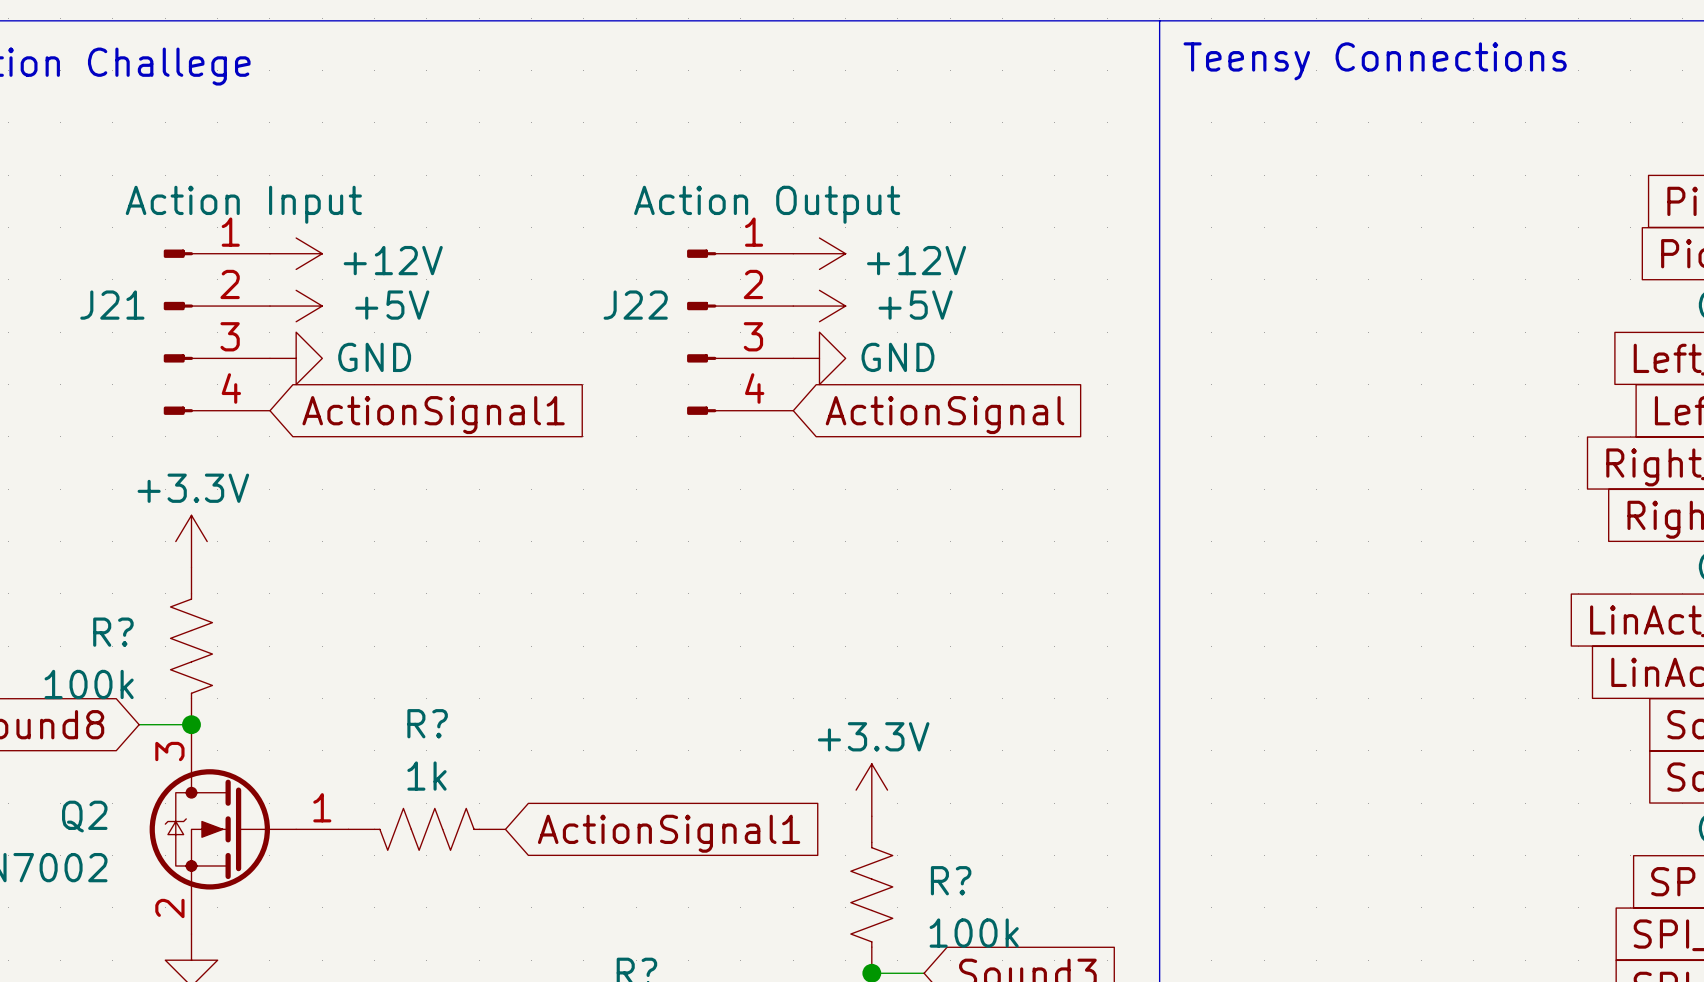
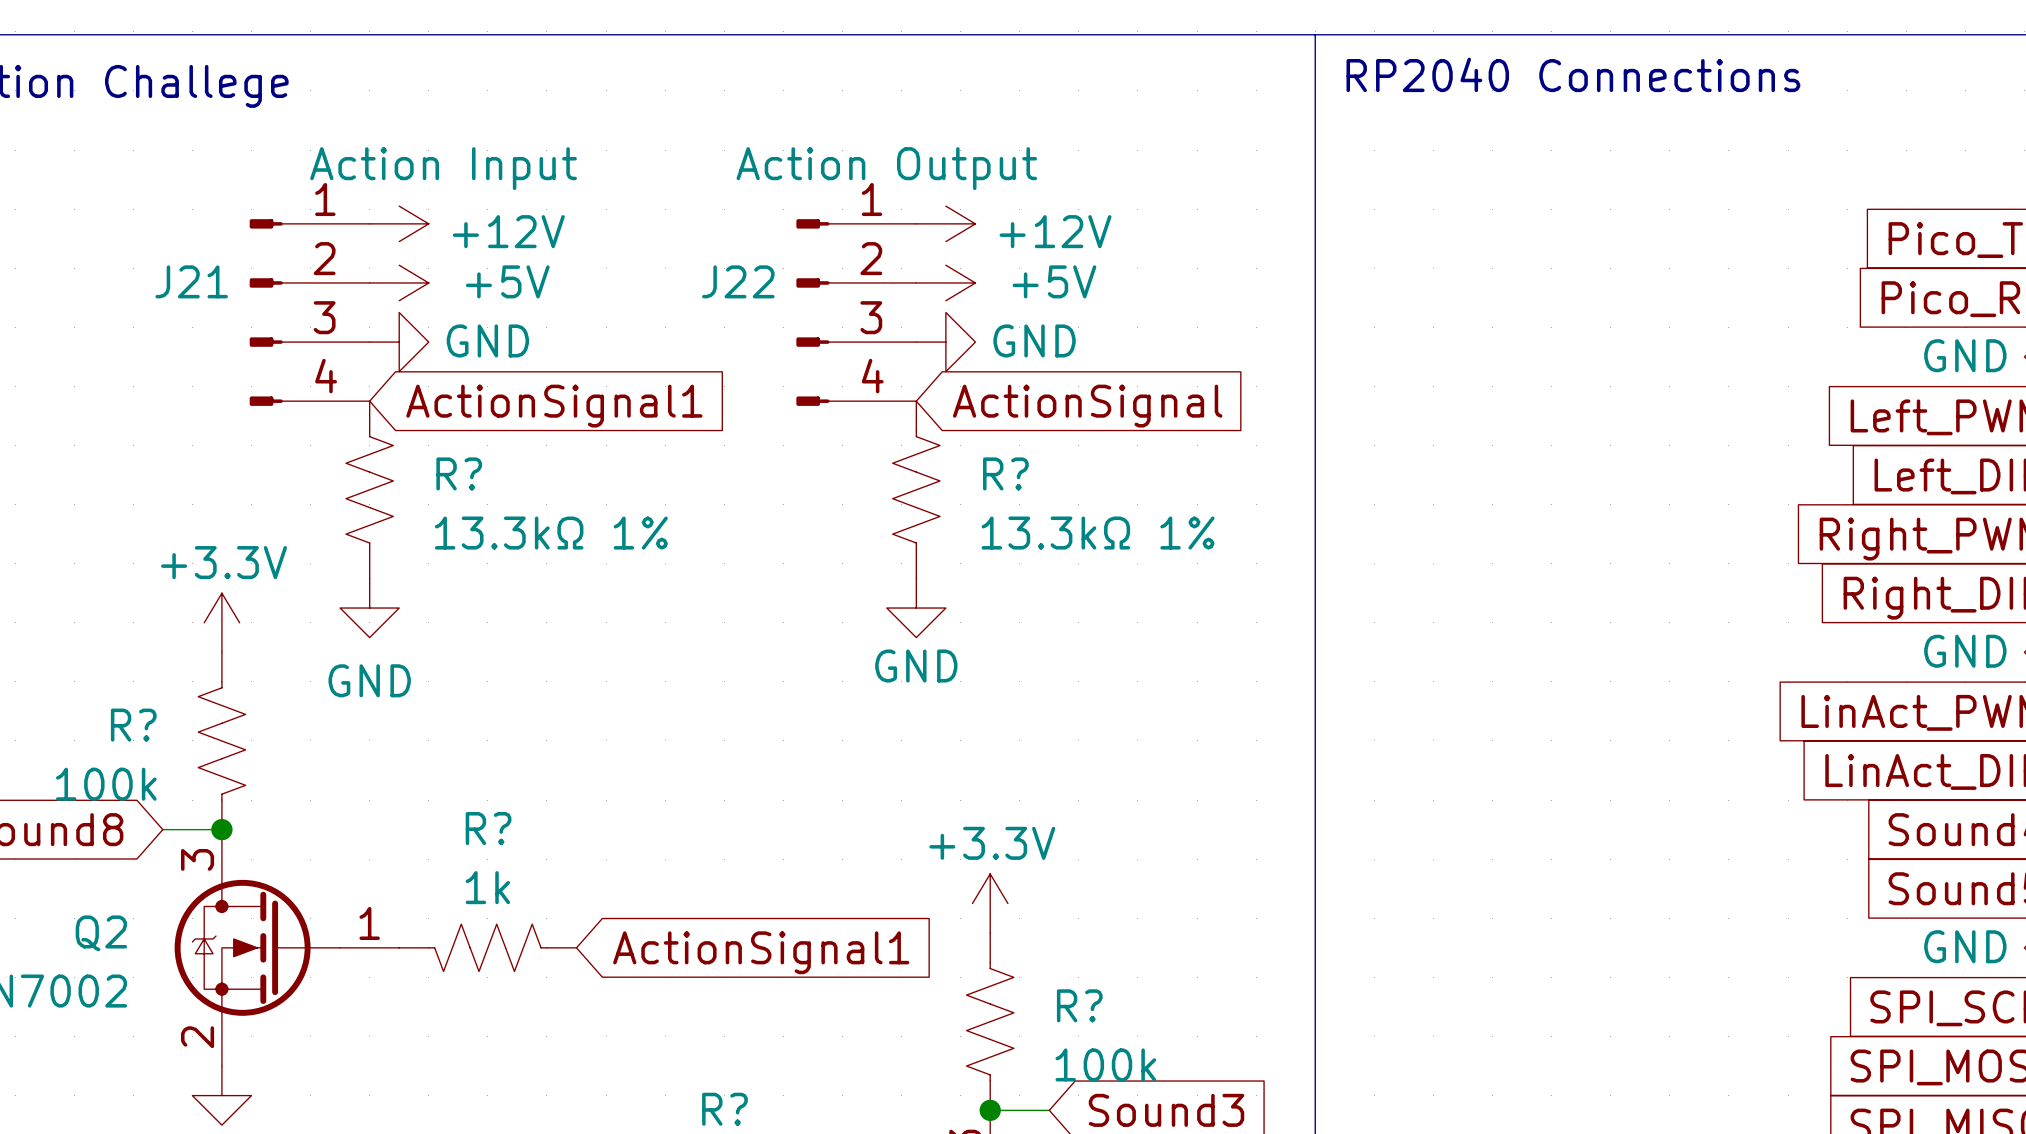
text: Teensy Connections (1375, 61) -> RP2040 Connections (1573, 74)
power symbol: none -> +12V (945, 223)
J21 value position: Action Input (243, 204) -> Action Input (443, 168)
power symbol position: +12V (296, 253) -> +12V (399, 223)
power symbol: +12V (819, 253) -> +5V (945, 282)
power symbol position: +5V (296, 306) -> +5V (399, 282)
power symbol: +5V (819, 306) -> GND (945, 342)
J21 position: (216, 332) -> (309, 312)
J22 position: (740, 332) -> (856, 312)
power symbol position: GND (296, 358) -> GND (399, 342)
power symbol rotation: 0° (819, 358) -> 90° clockwise (916, 608)
power symbol position: GND (819, 358) -> GND (916, 608)
global label position: ActionSignal1 (433, 415) -> ActionSignal1 (554, 406)
global label position: ActionSignal (945, 415) -> ActionSignal (1087, 406)
R?: none -> 13.3kΩ 1% (369, 489)
R?: none -> 13.3kΩ 1% (916, 489)
power symbol: none -> GND (369, 608)

